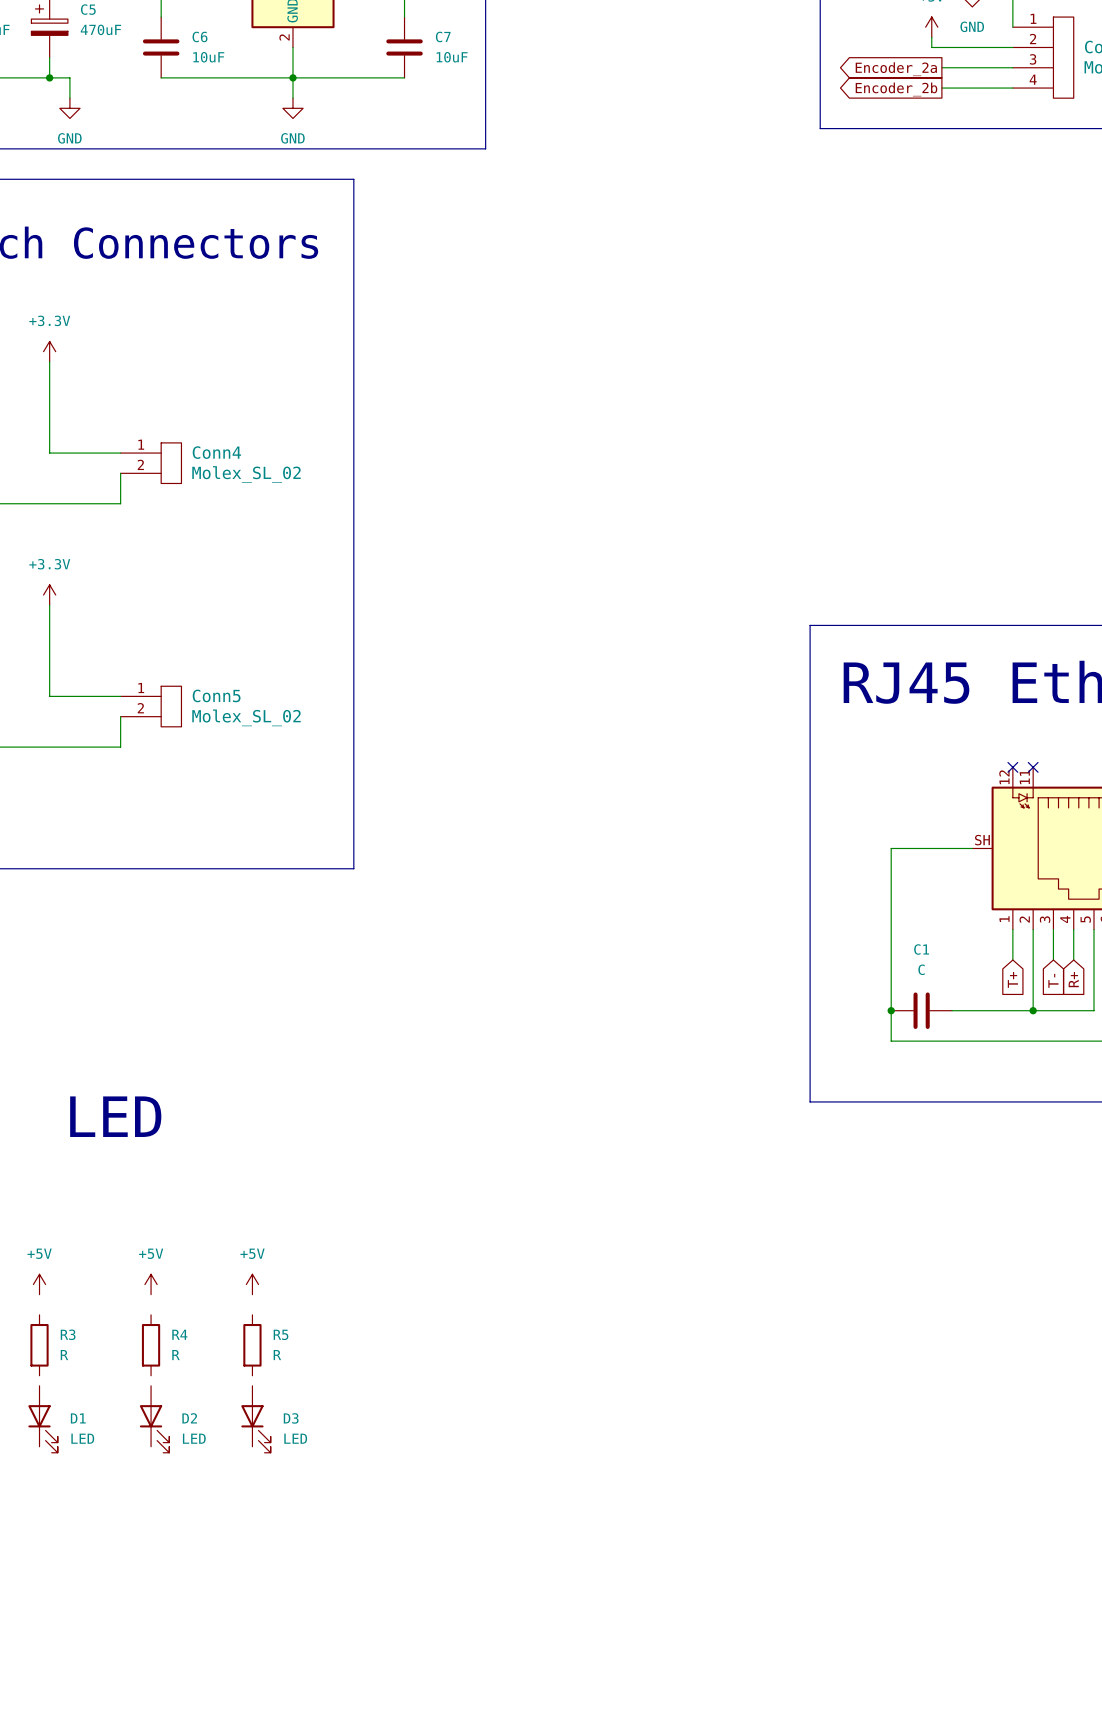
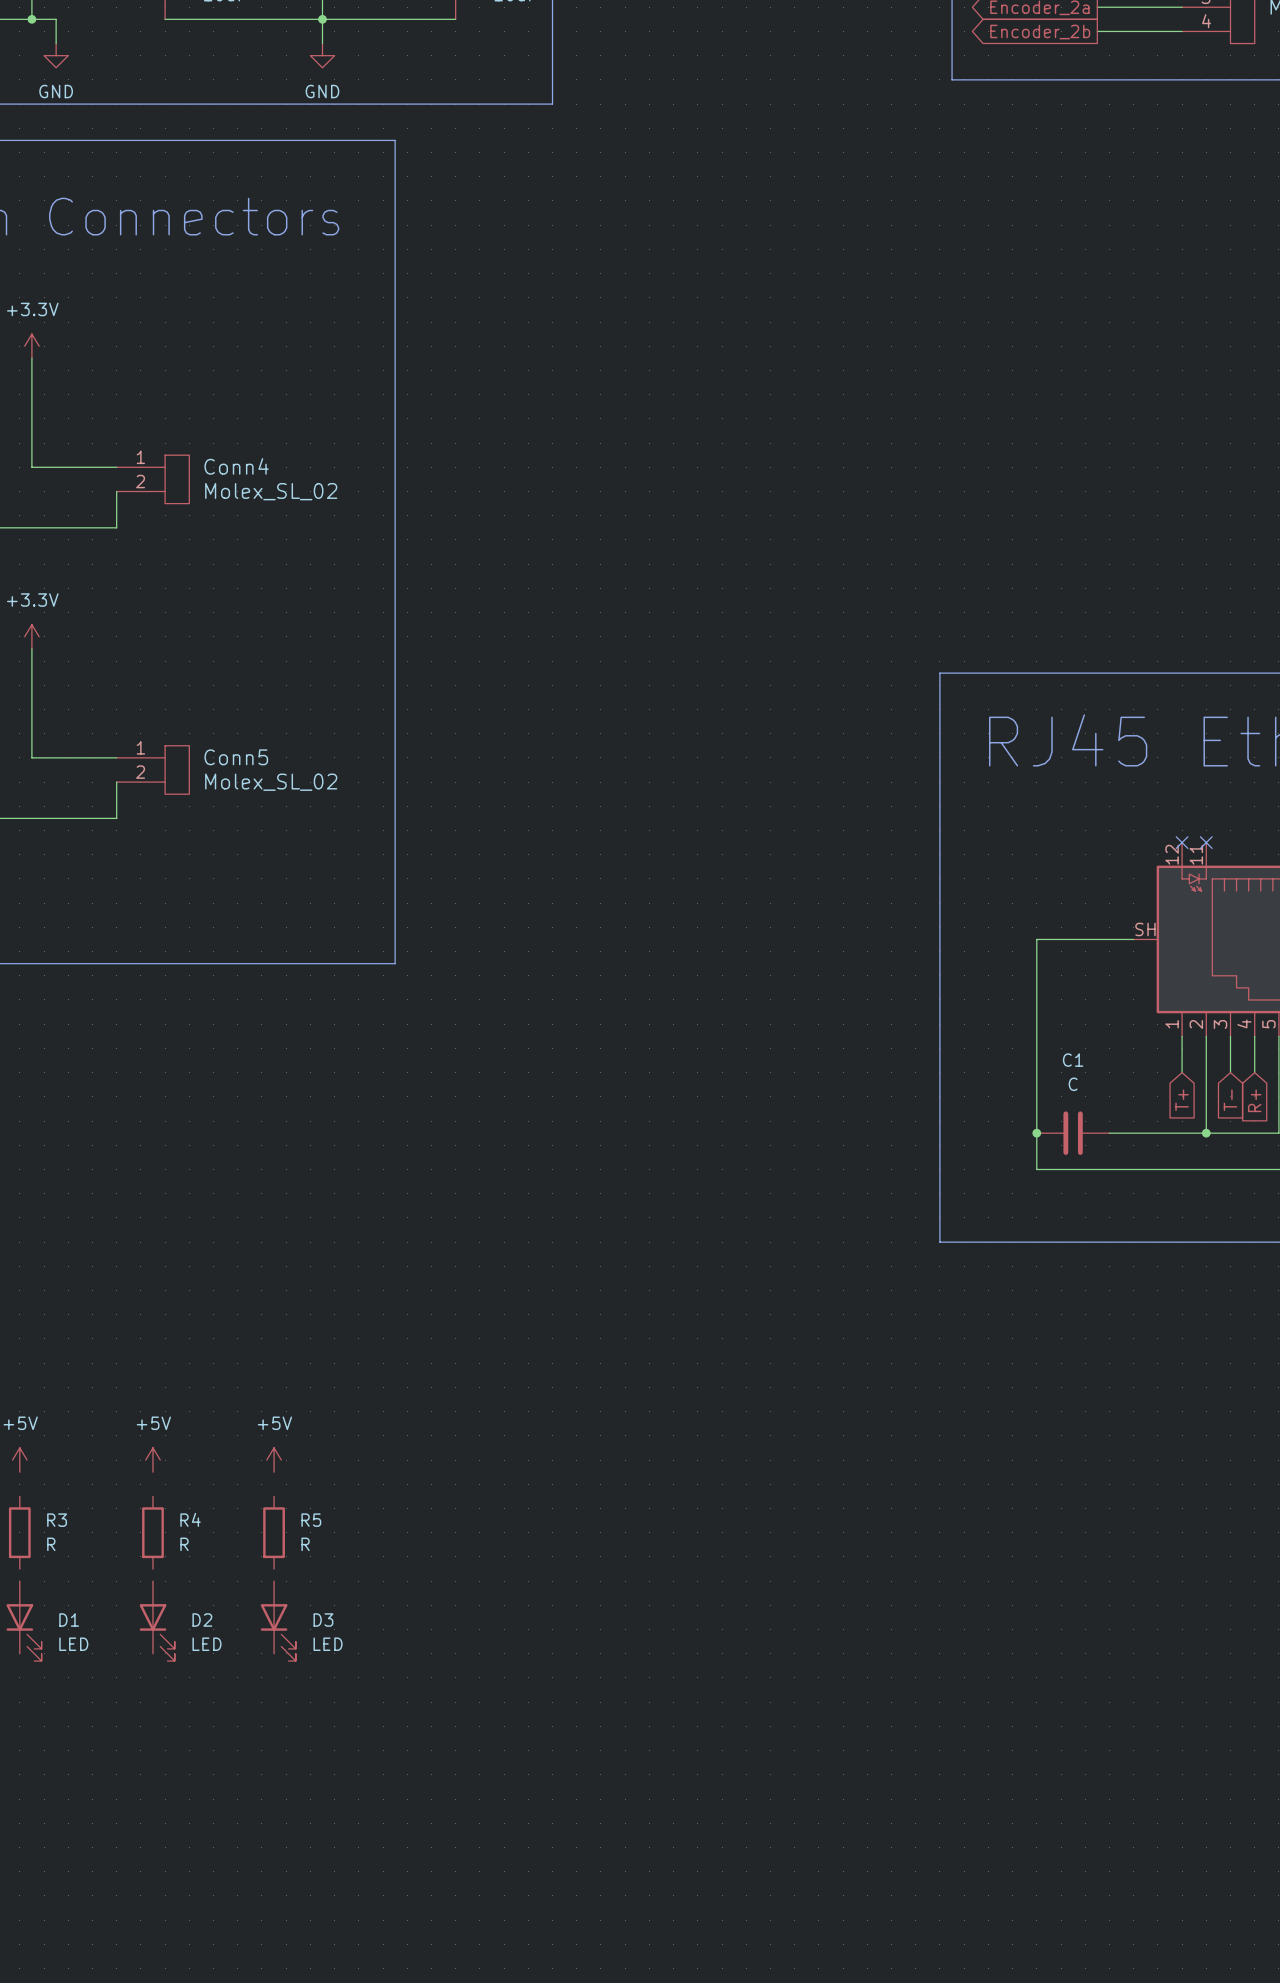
text: LED (115, 1116) -> none

